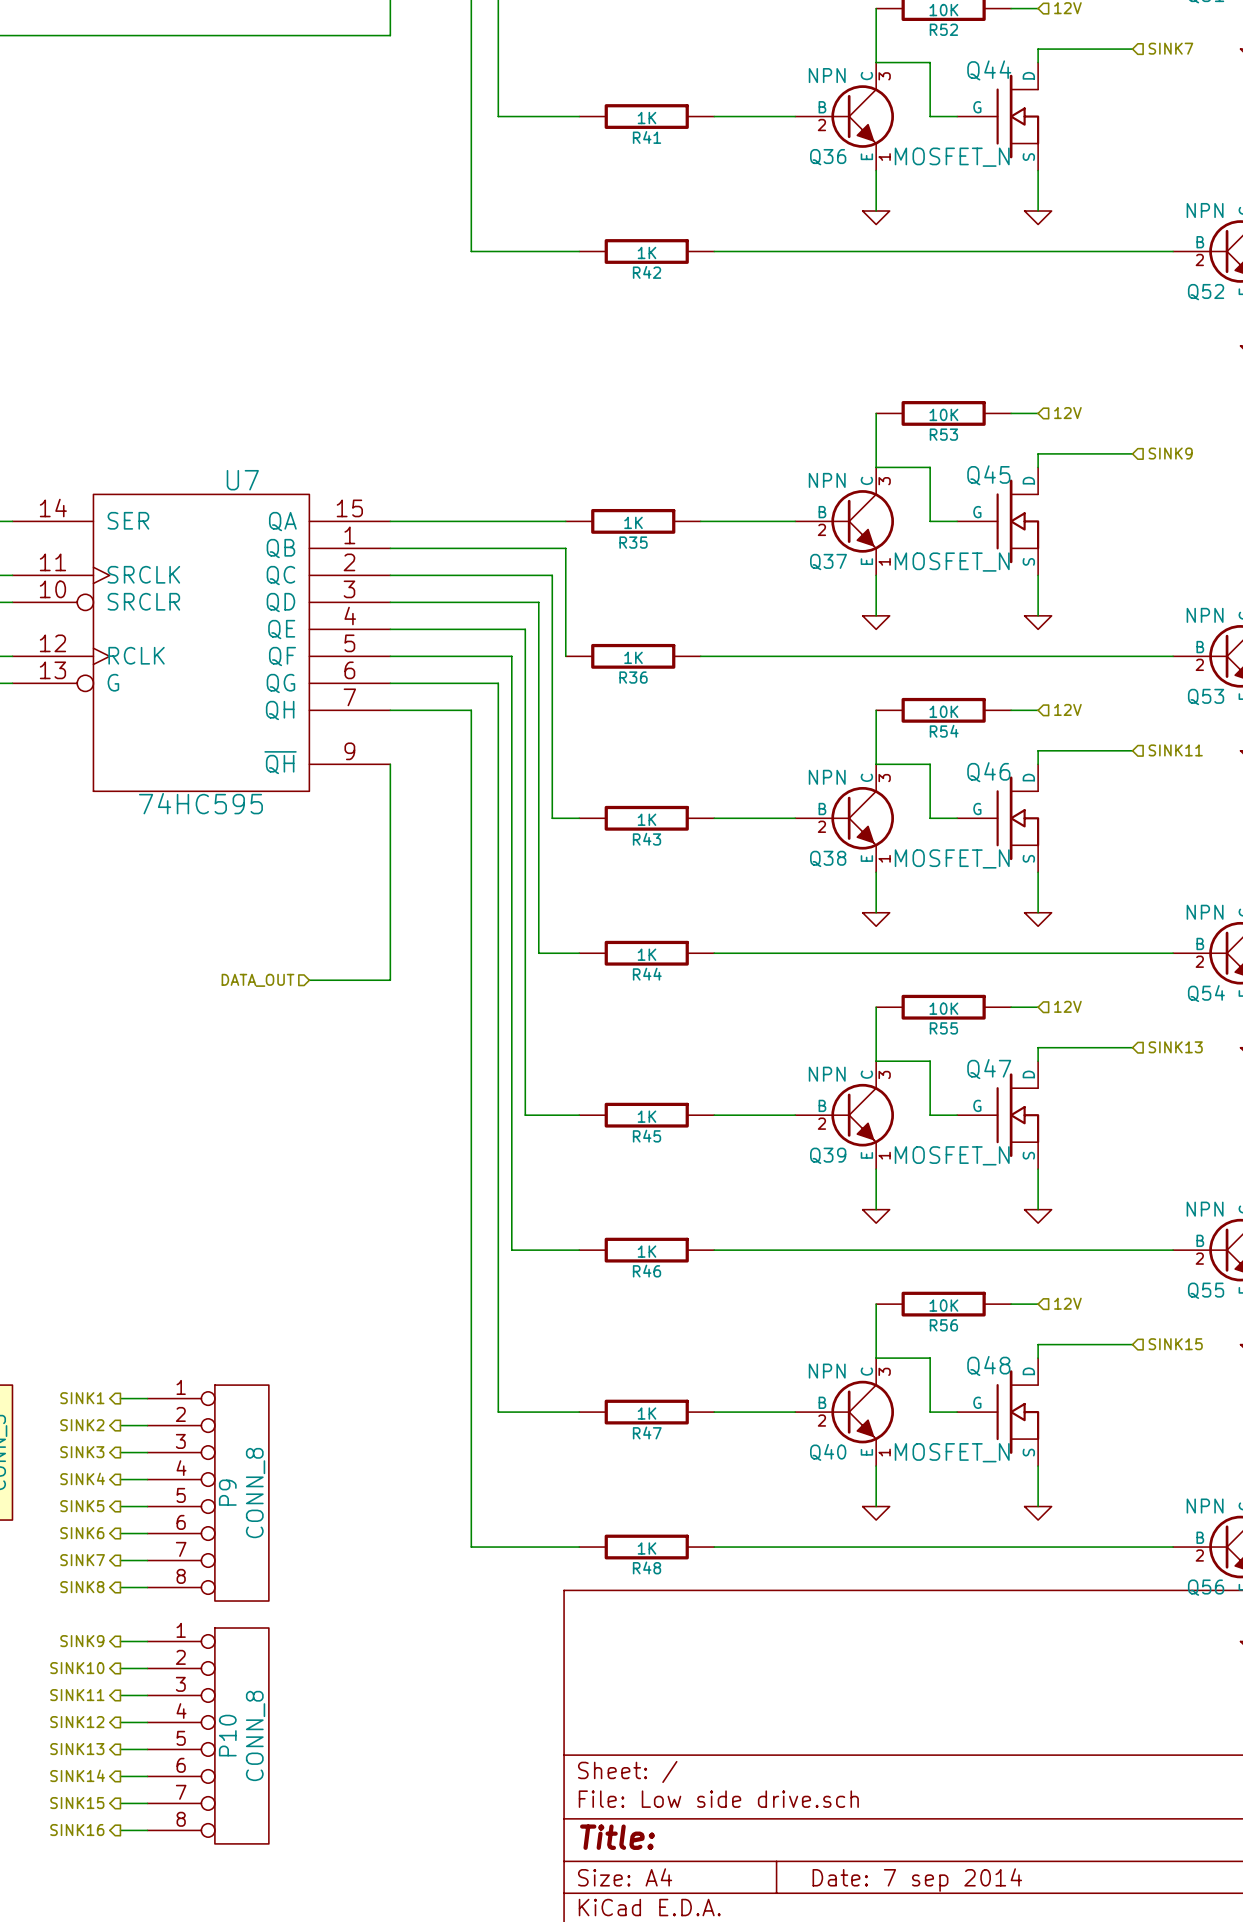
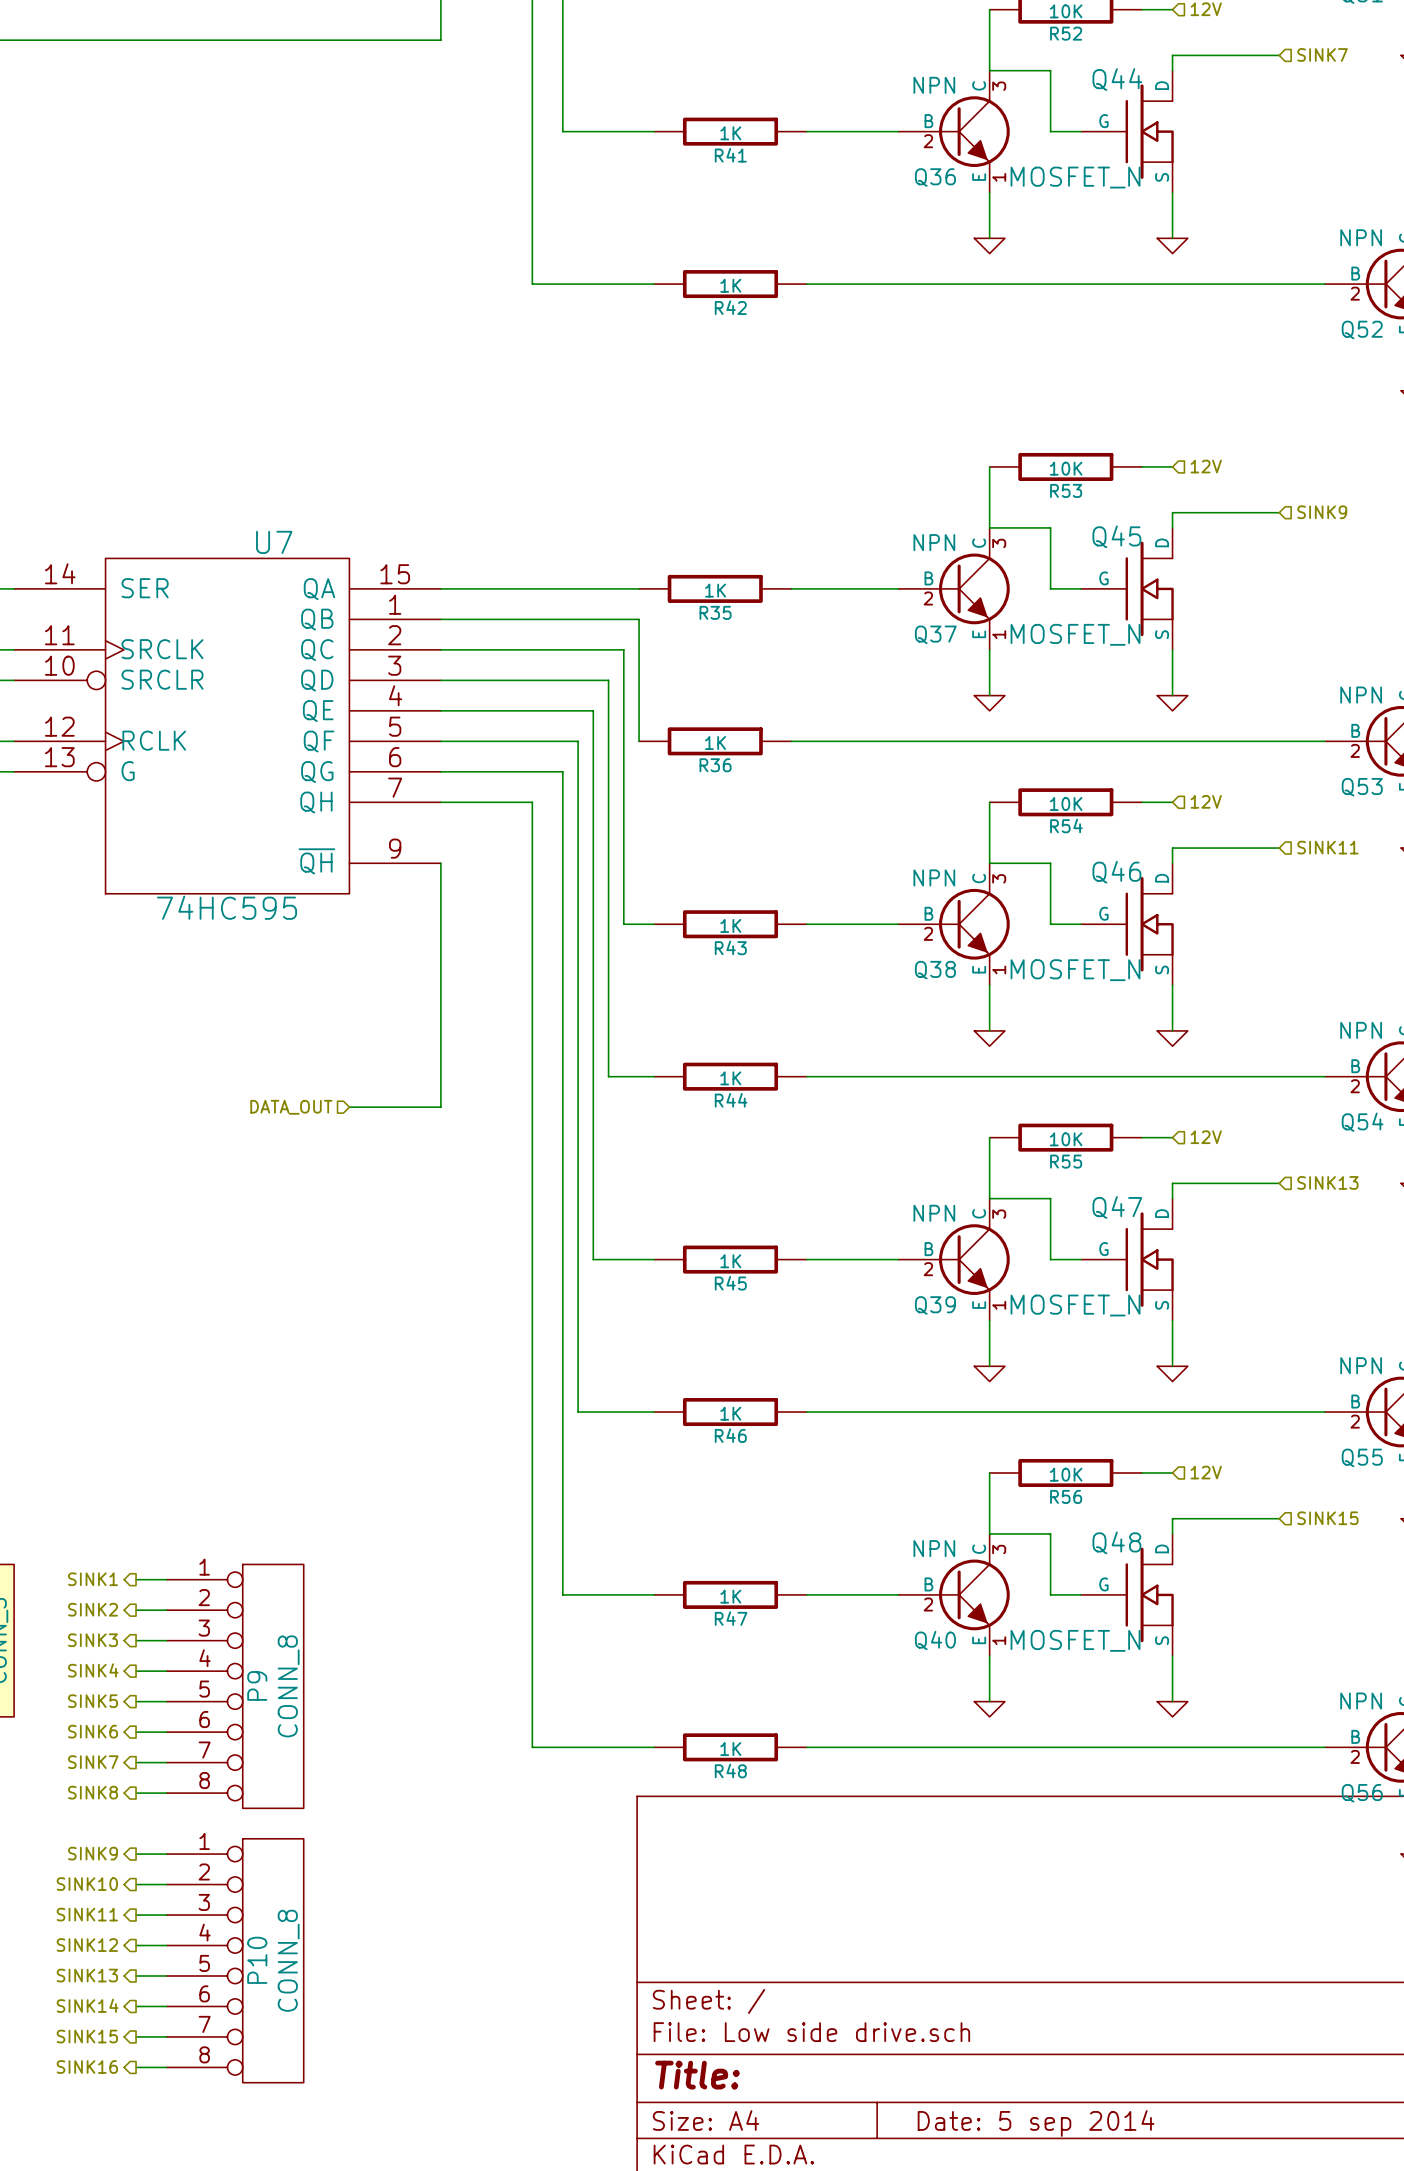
title block: Date: 7 sep 2014 (917, 1880) -> Date: 5 sep 2014 (1036, 2123)

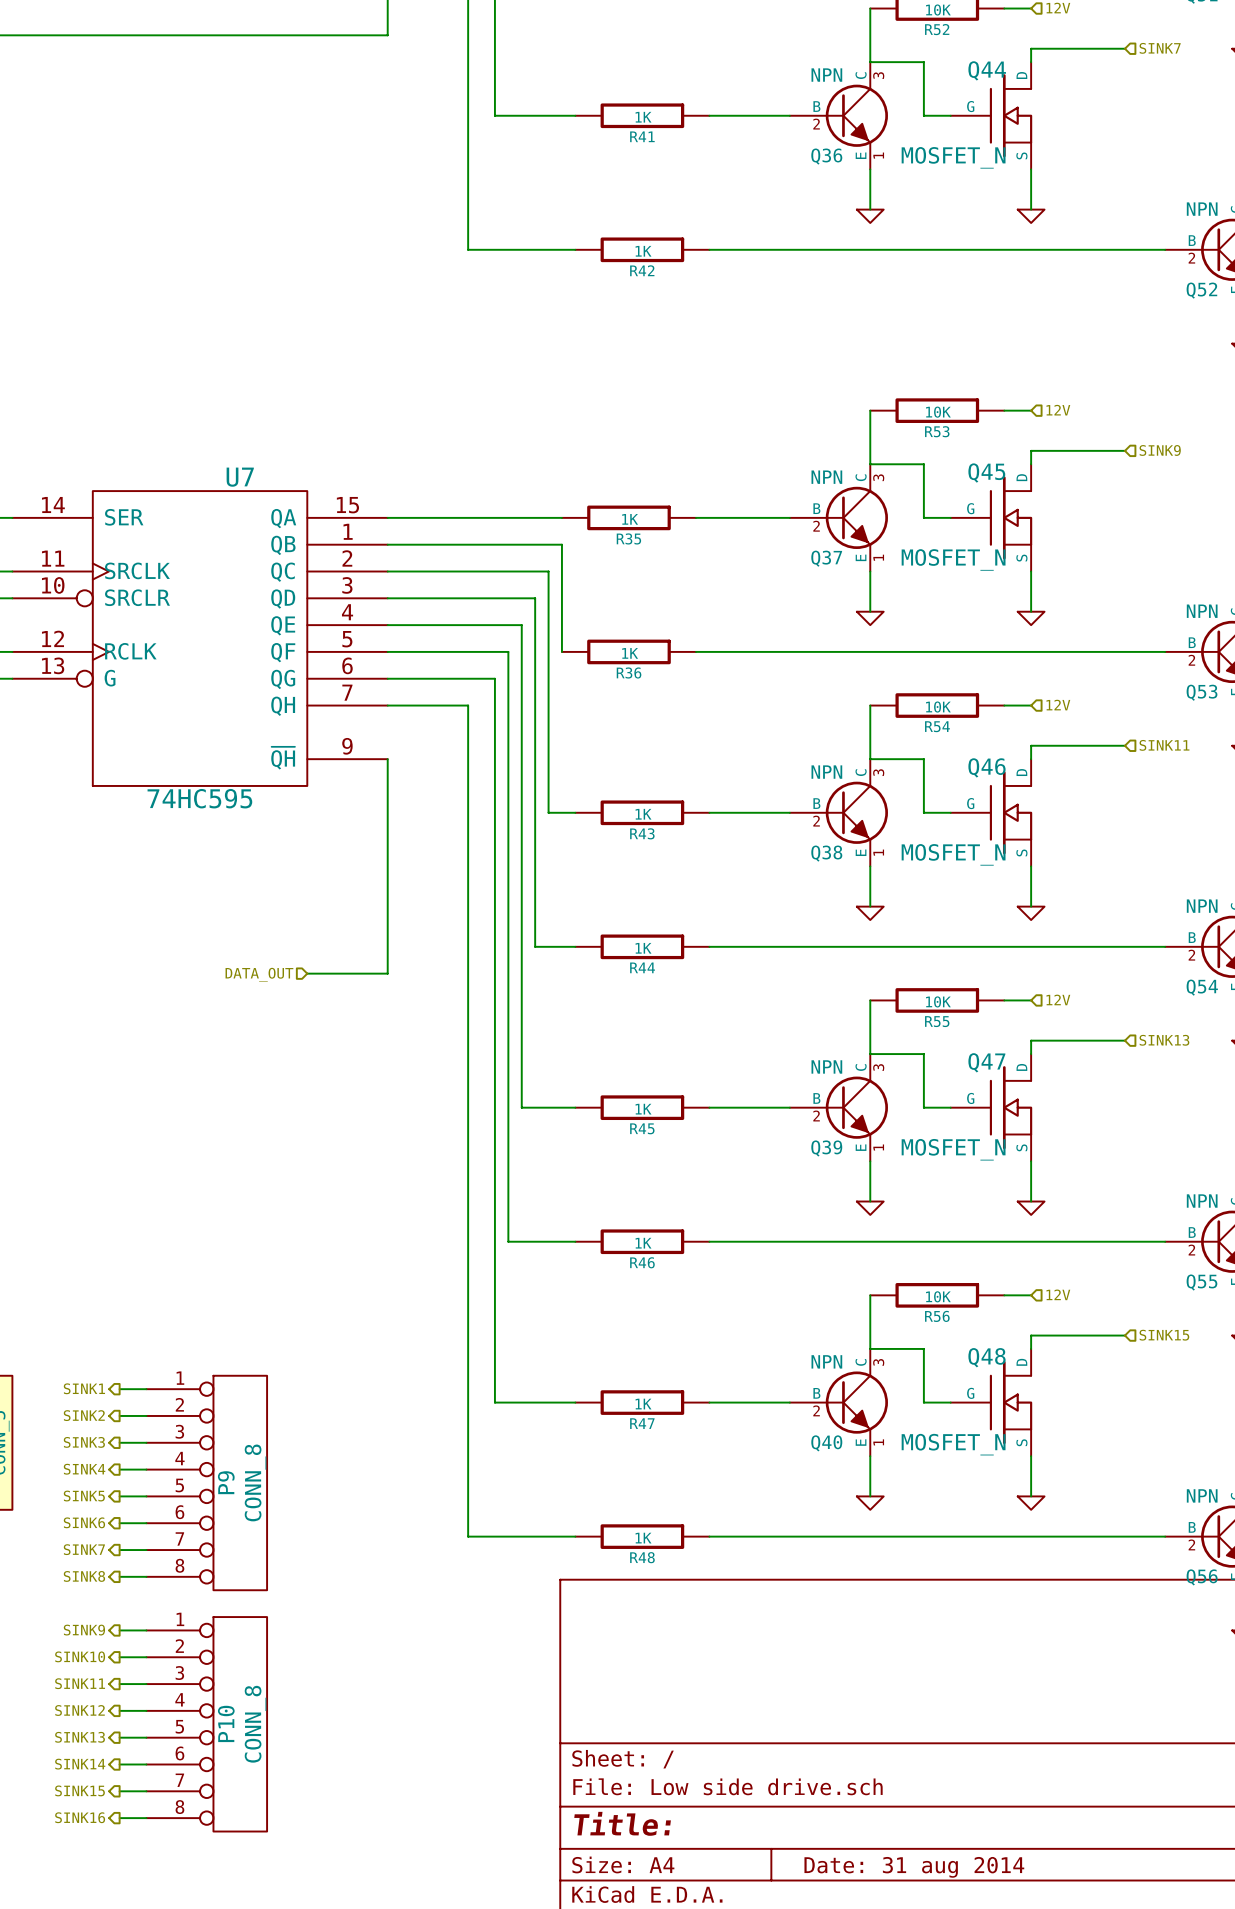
title block: Date: 5 sep 2014 (1036, 2123) -> Date: 31 aug 2014 (914, 1867)

